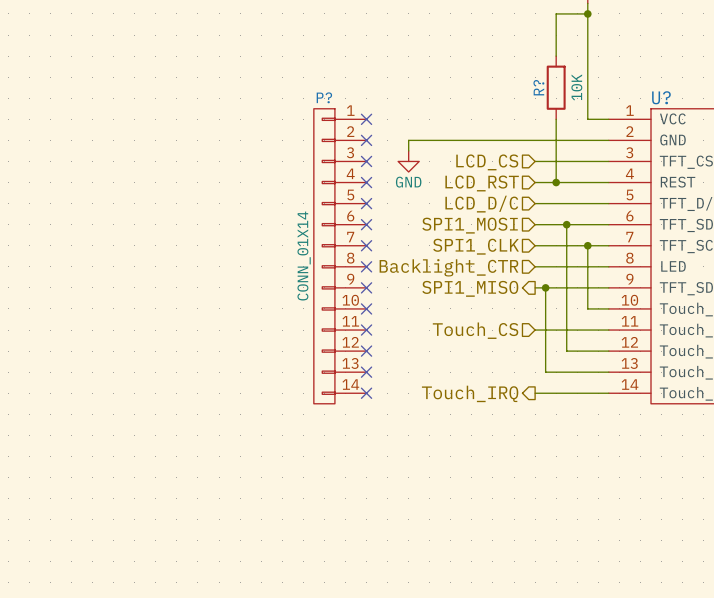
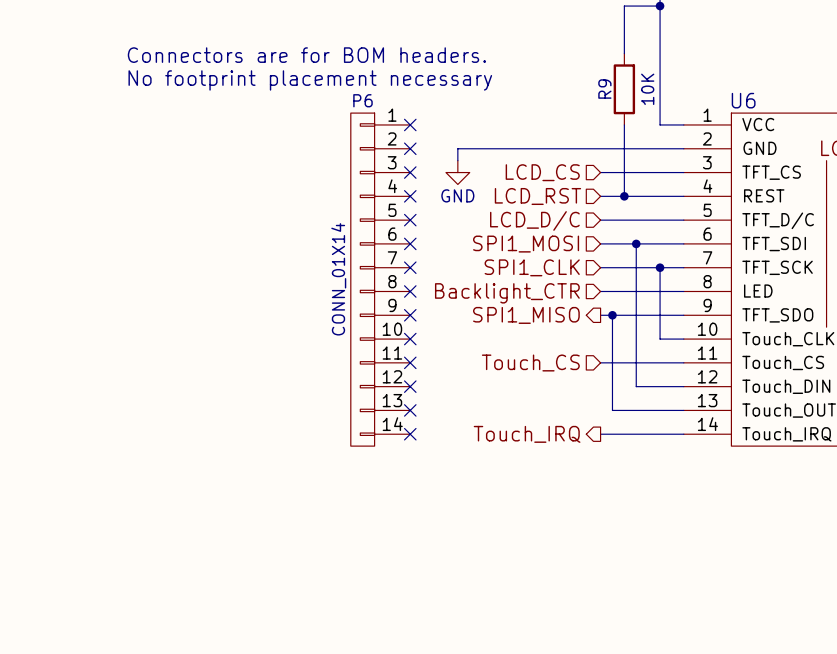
text: none -> Connectors are for BOM headers. (306, 55)
text: none -> No footprint placement necessary (310, 80)
R? name: R? (538, 87) -> R9 (604, 89)
P? name: P? (324, 97) -> P6 (362, 100)
U? name: U? (661, 97) -> U6 (743, 100)

